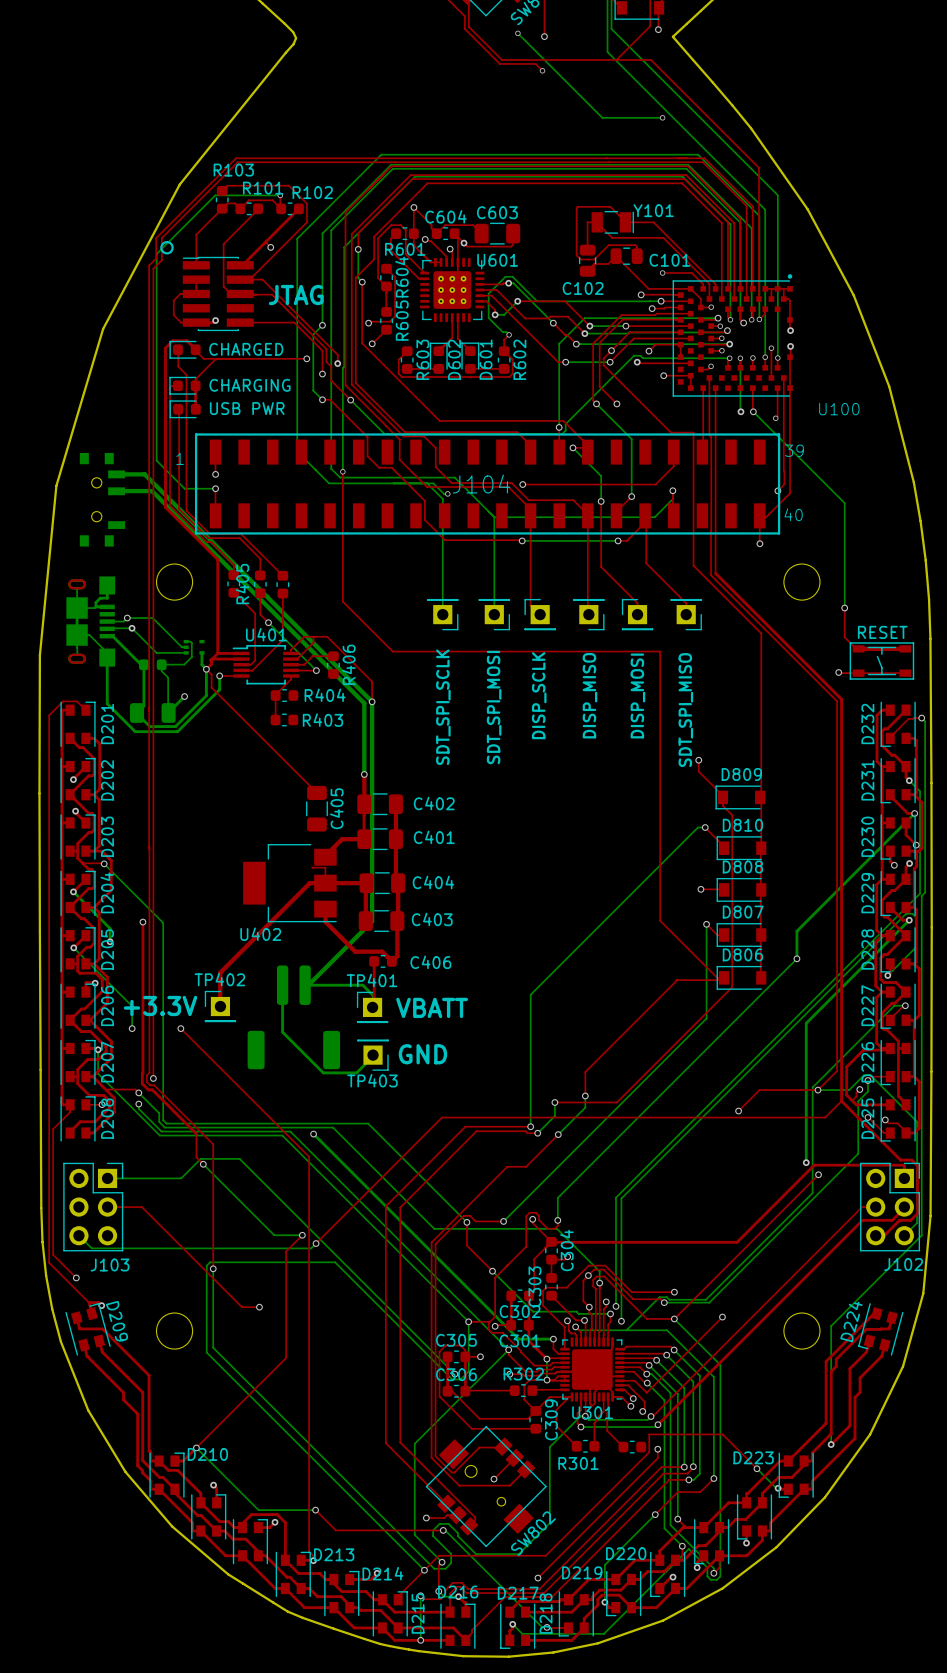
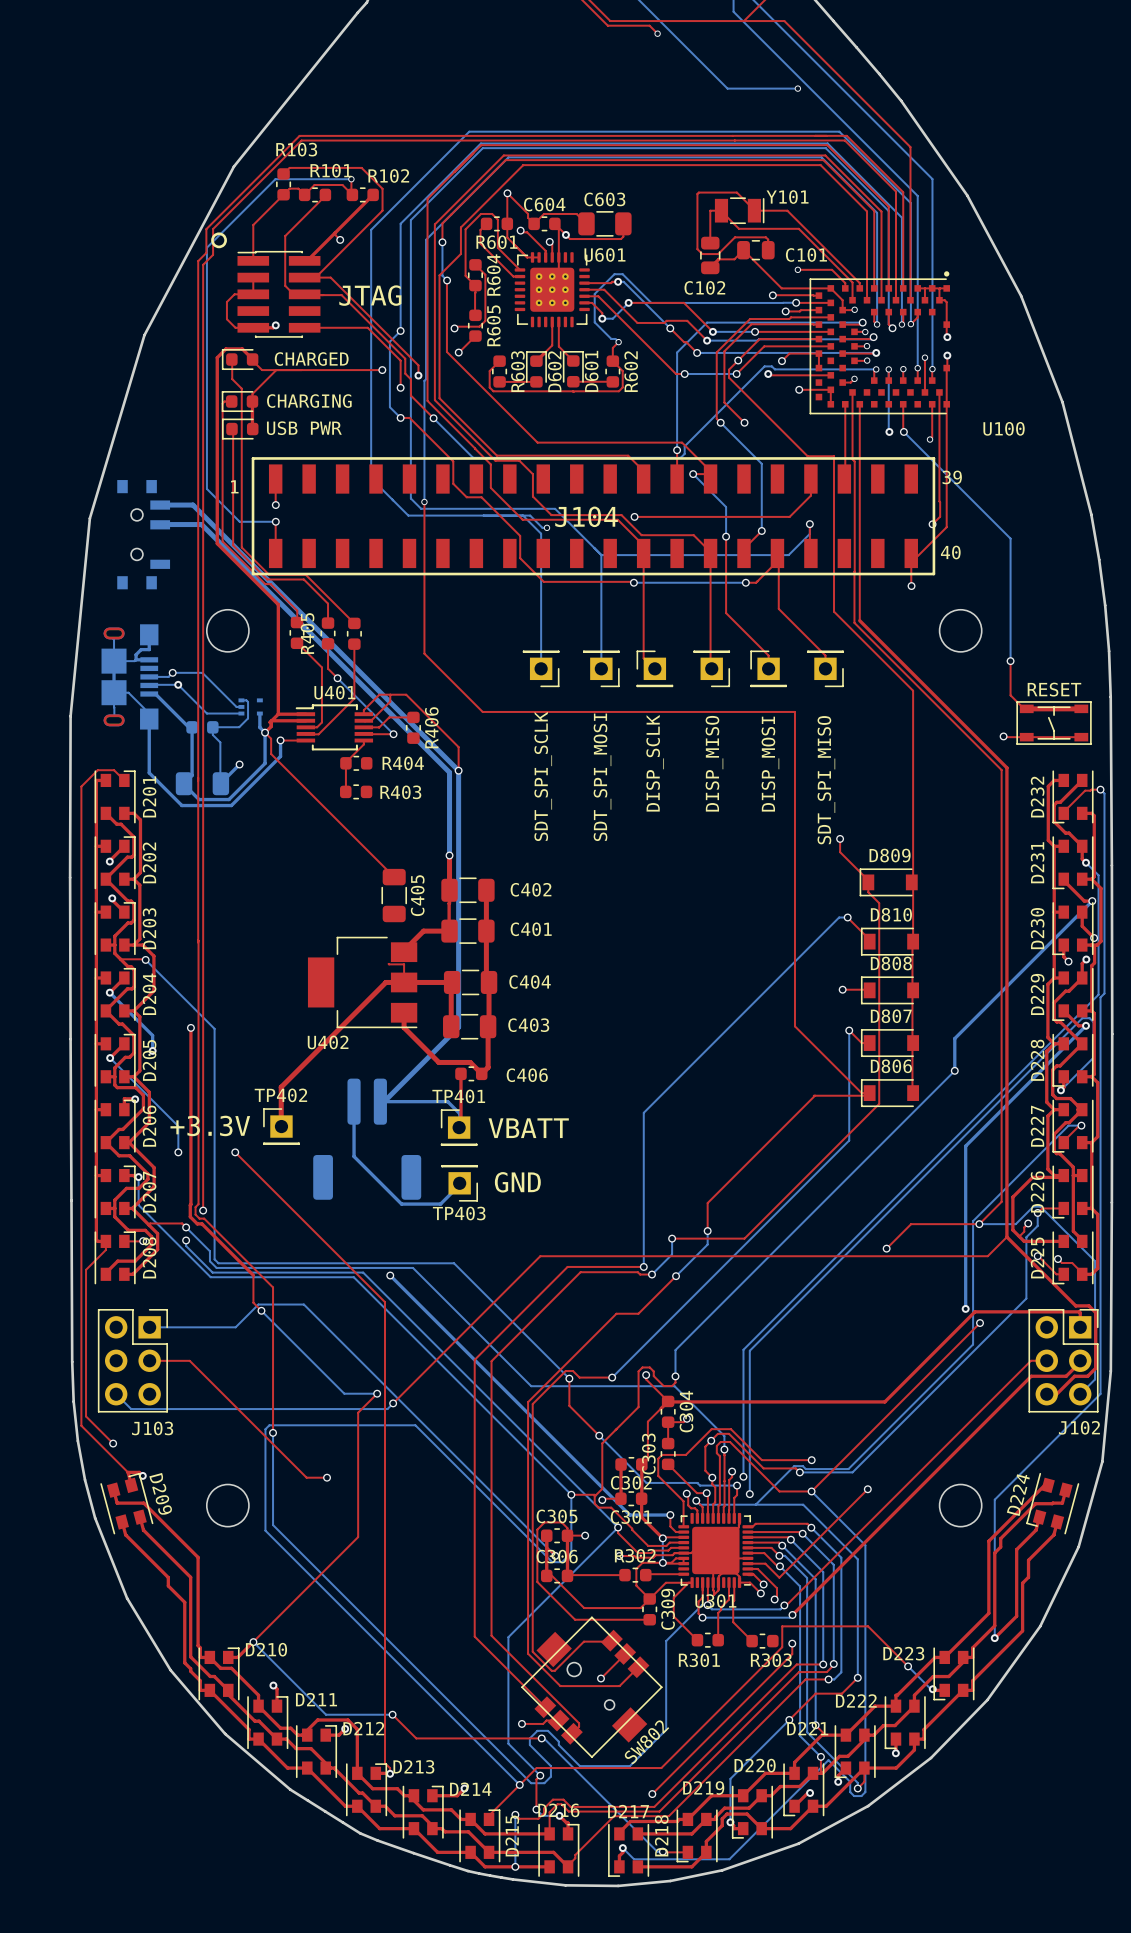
R303 name: none -> R303 (771, 1660)
D211 name: none -> D211 (316, 1699)
D222 name: none -> D222 (856, 1700)
D212 name: none -> D212 (363, 1728)
D221 name: none -> D221 (807, 1728)

